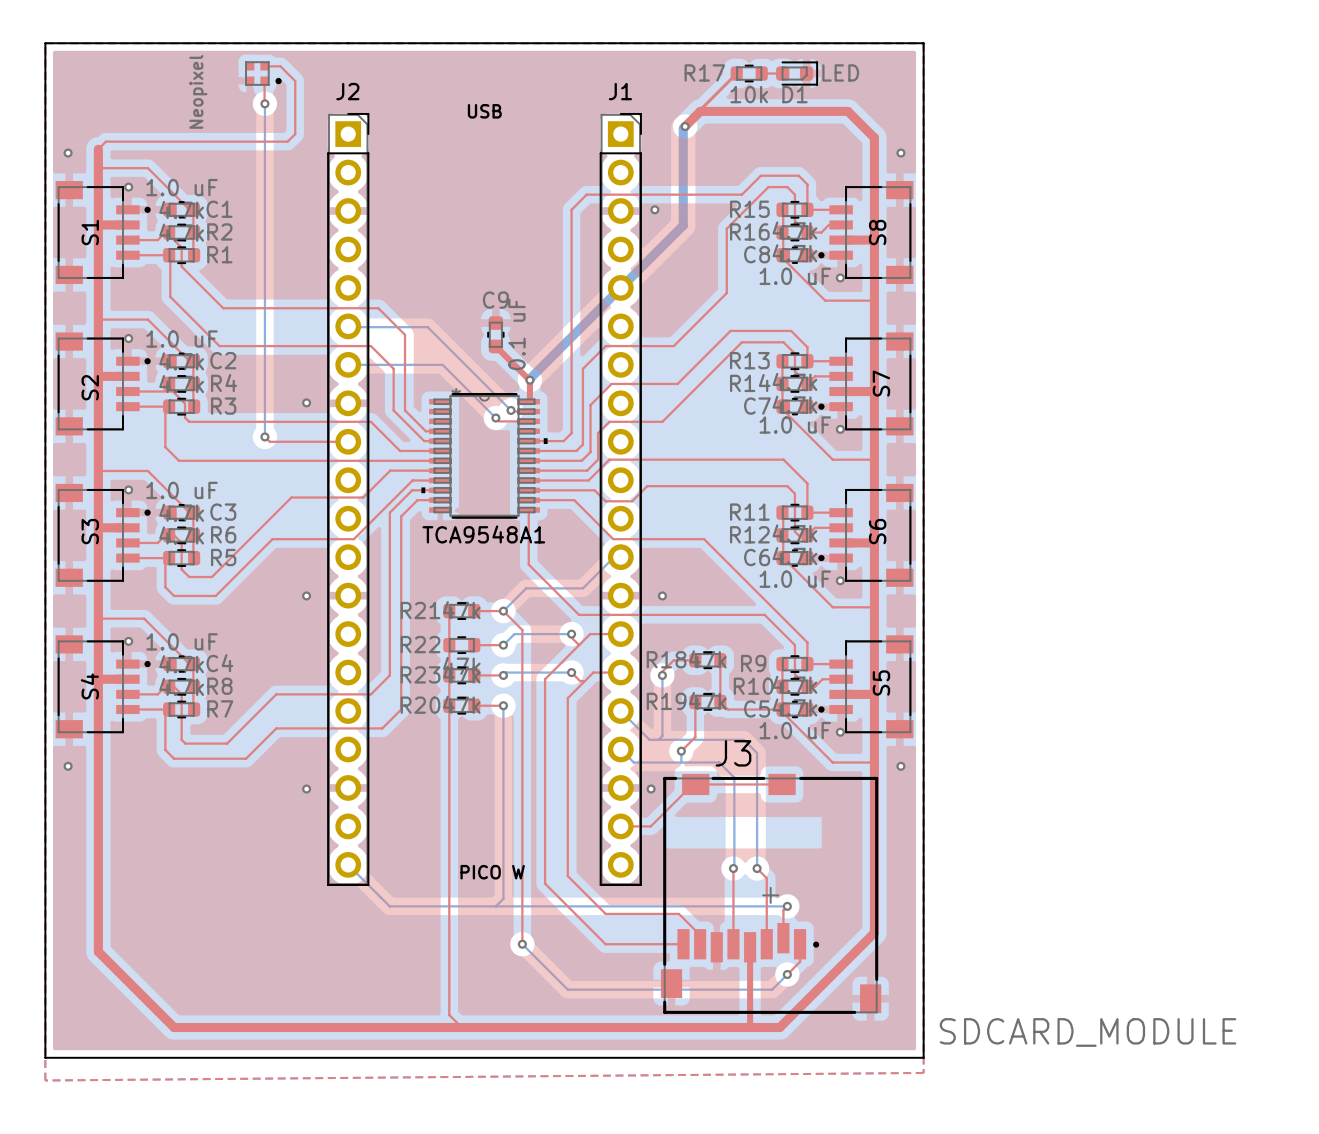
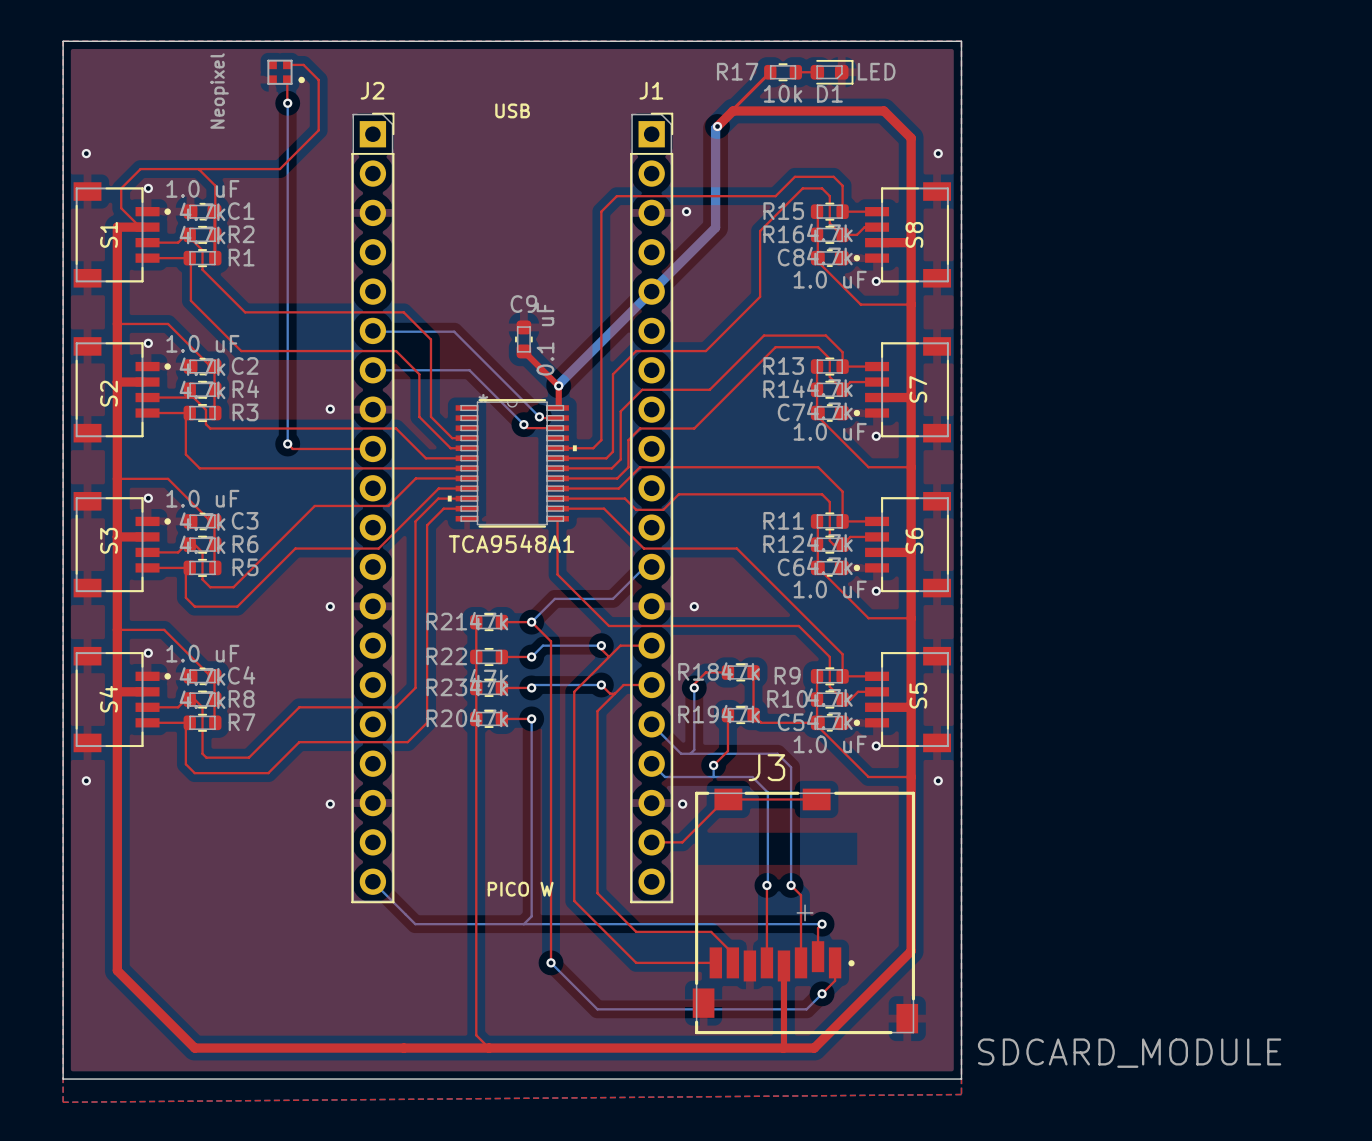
top track: (295, 130) (295, 134) (287, 141) (105, 141) (98, 149) (98, 224) -> (318, 130) (279, 169) (168, 169)
top track: (98, 168) (121, 168) -> (154, 227) (140, 227) (121, 208) (121, 188) (140, 169)
top track: (147, 168) (189, 209) -> none
top track: none -> (198, 169) (215, 185) (215, 258)

